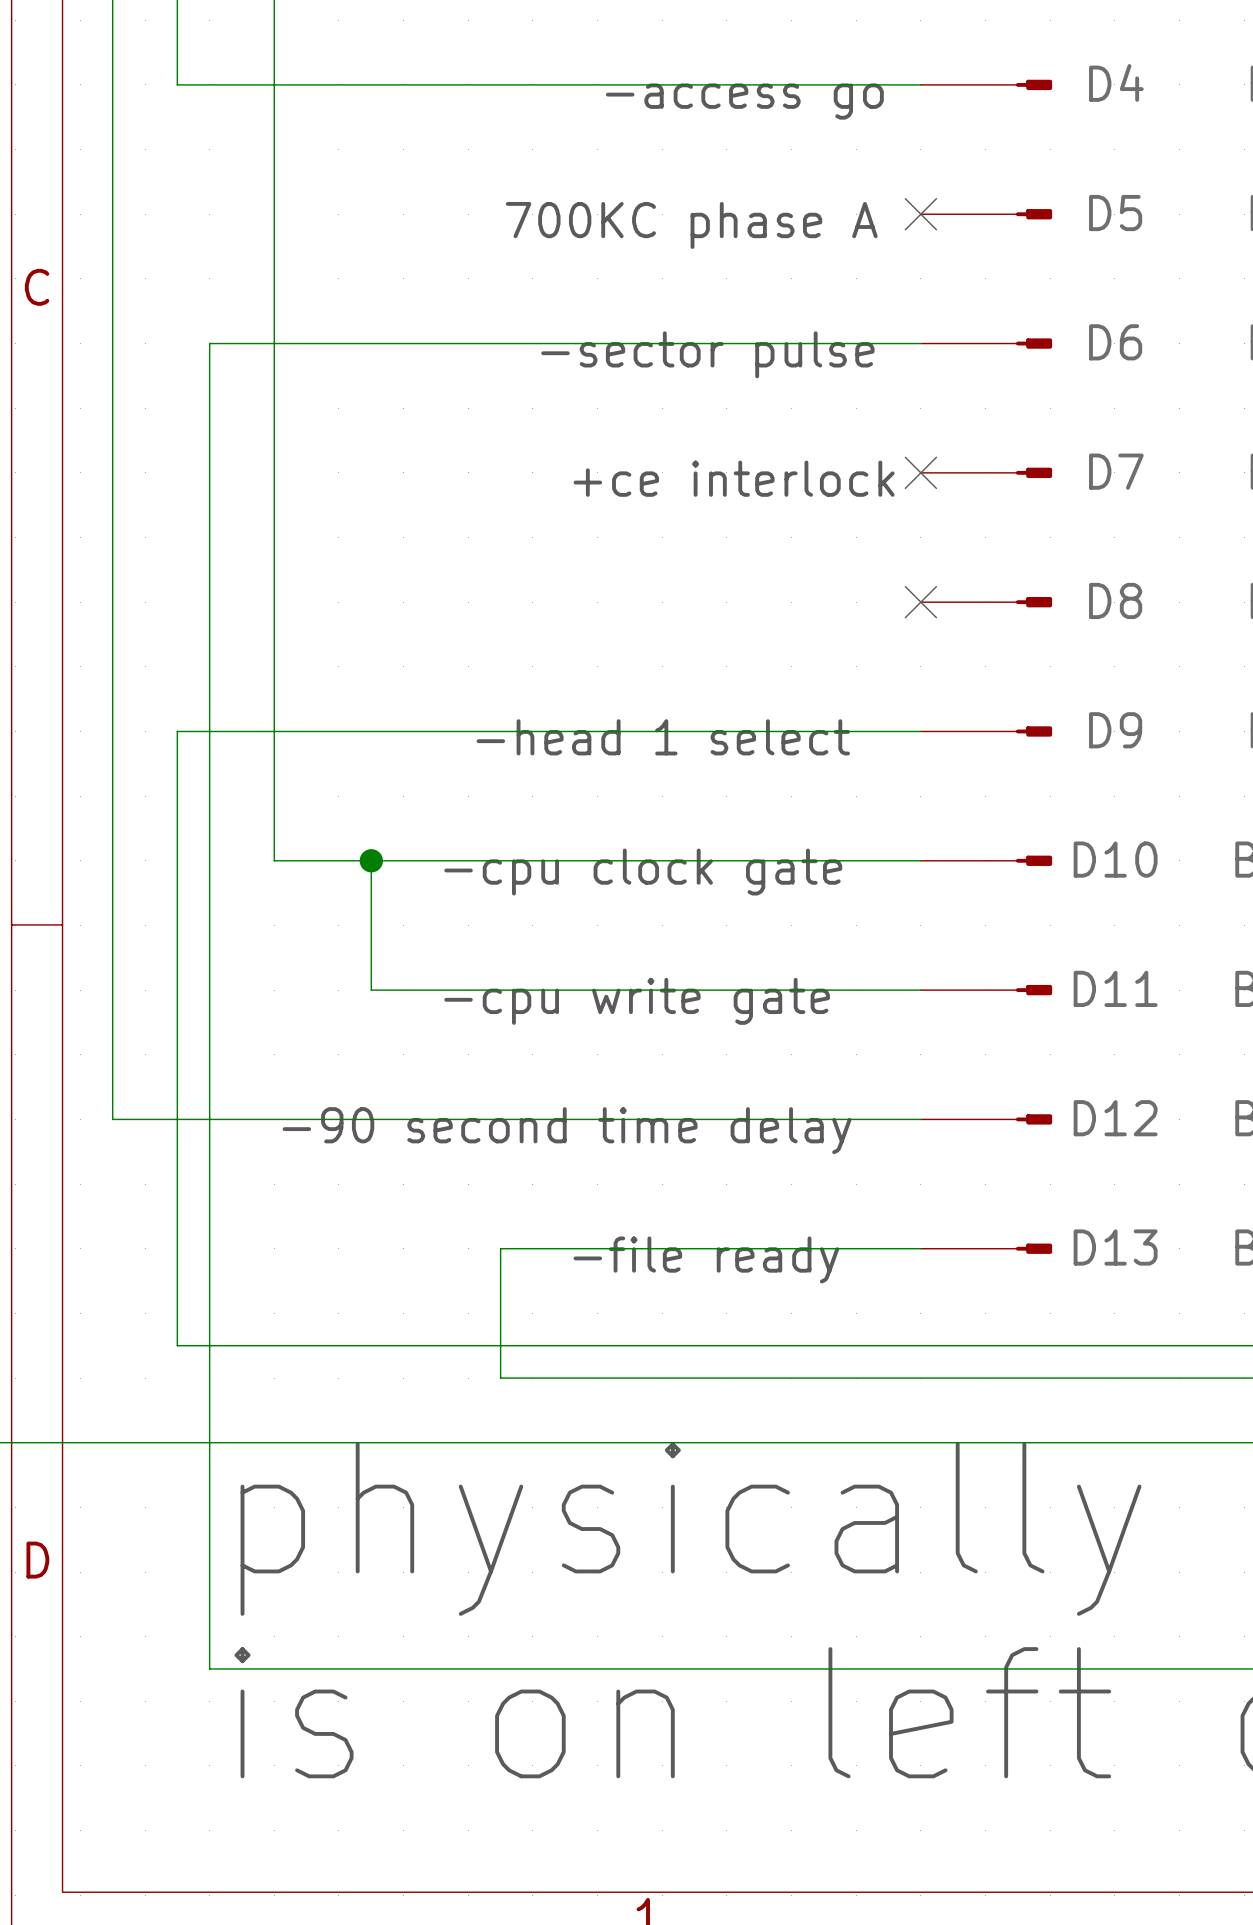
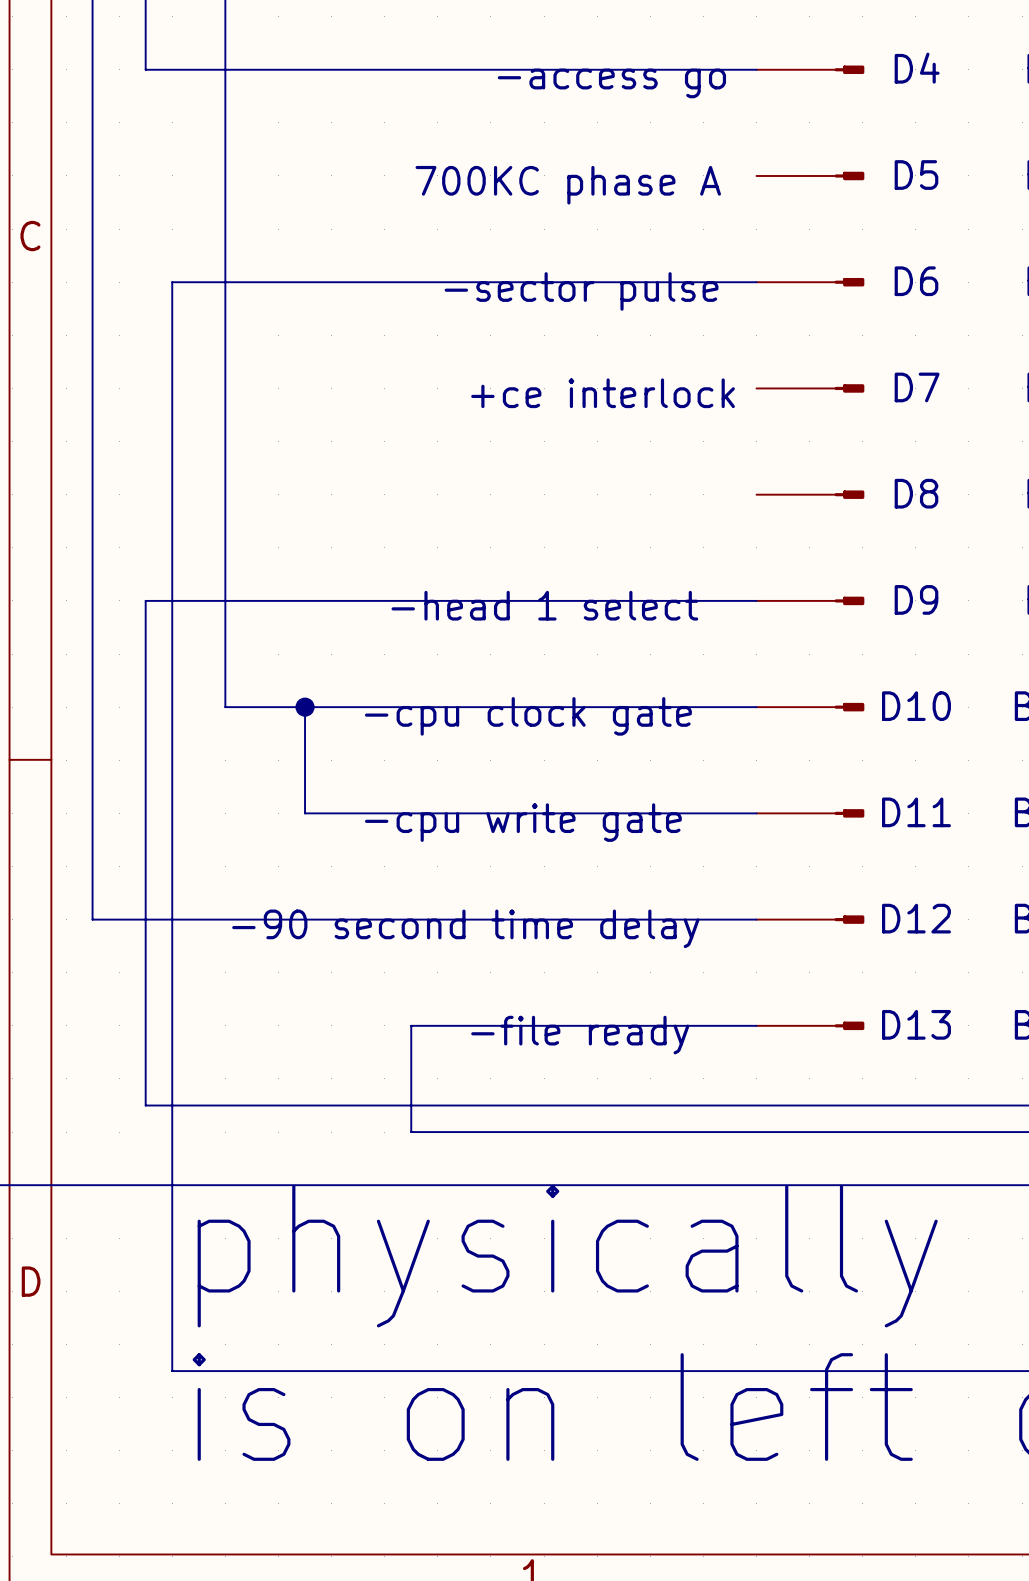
no-connect mark: (920, 214) -> none
no-connect mark: (920, 472) -> none
no-connect mark: (920, 602) -> none

